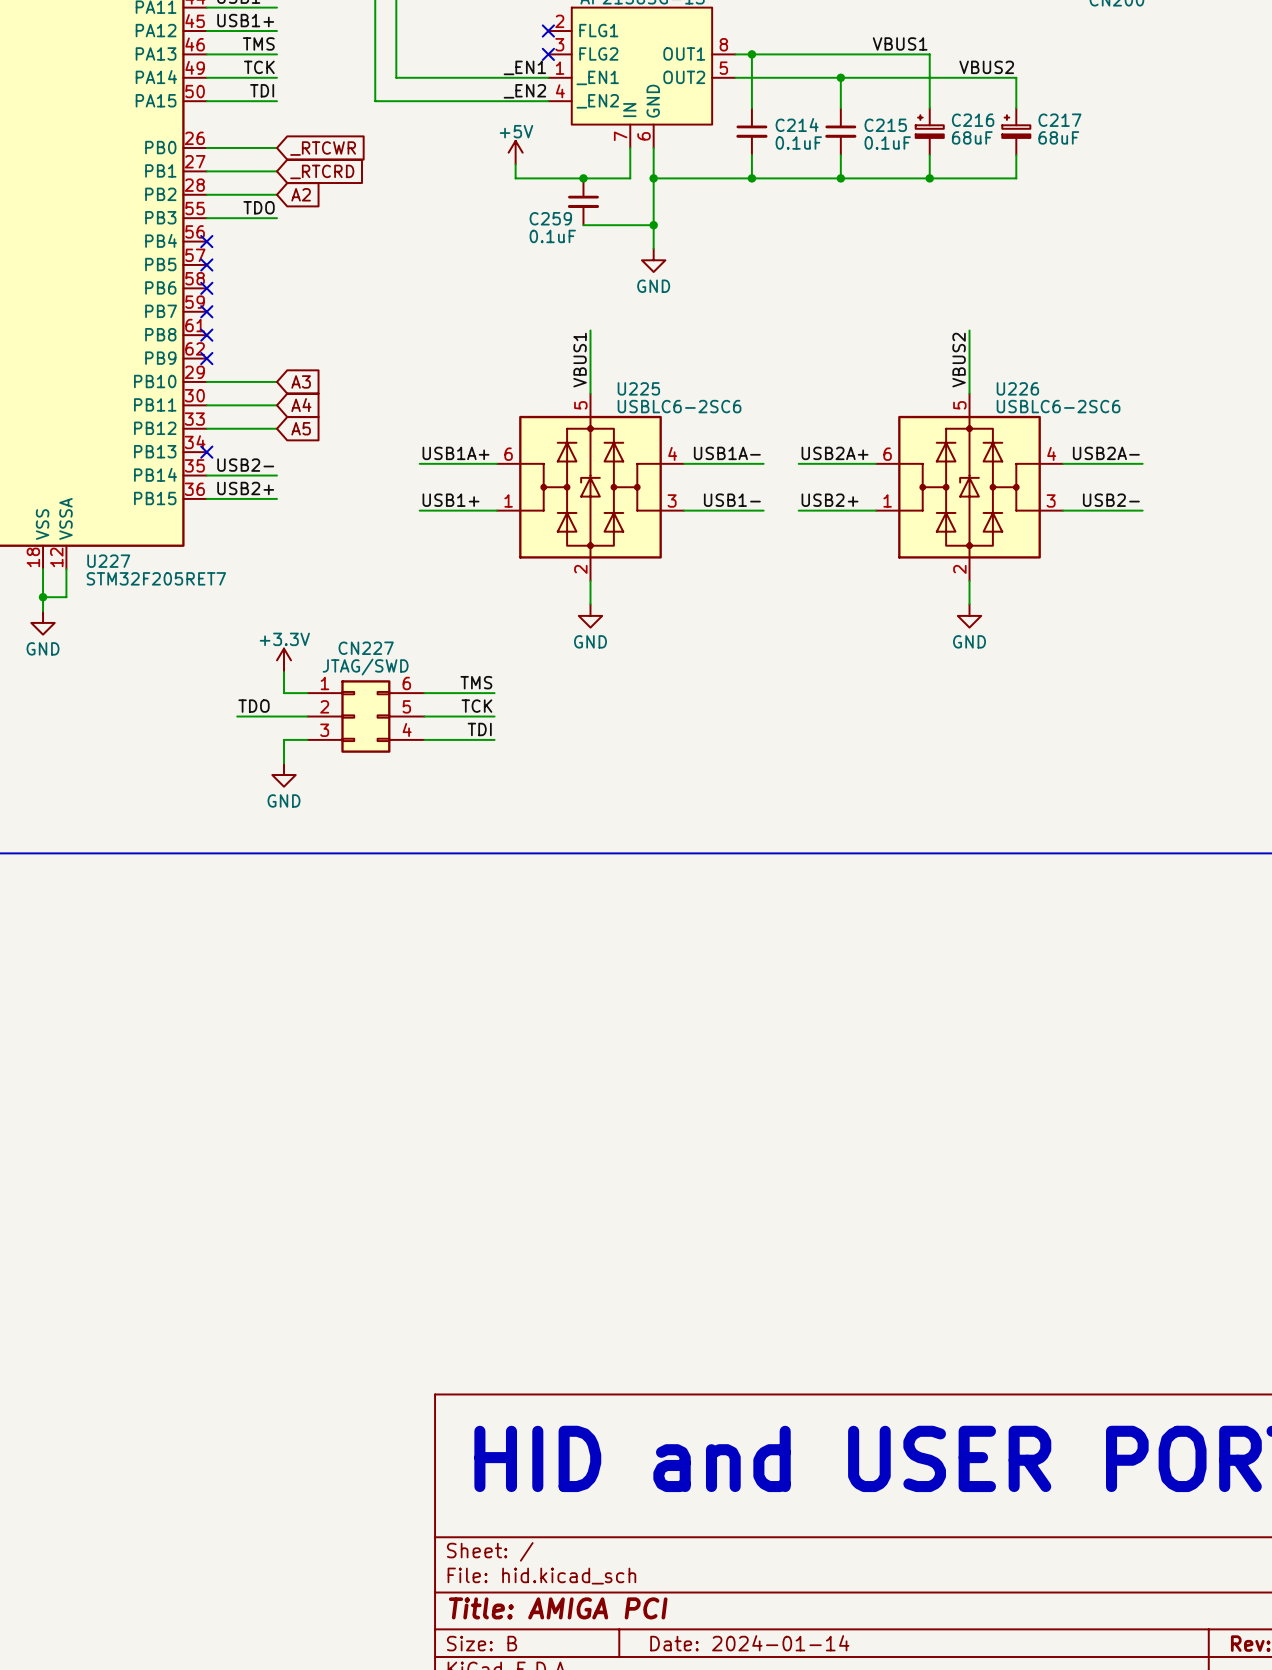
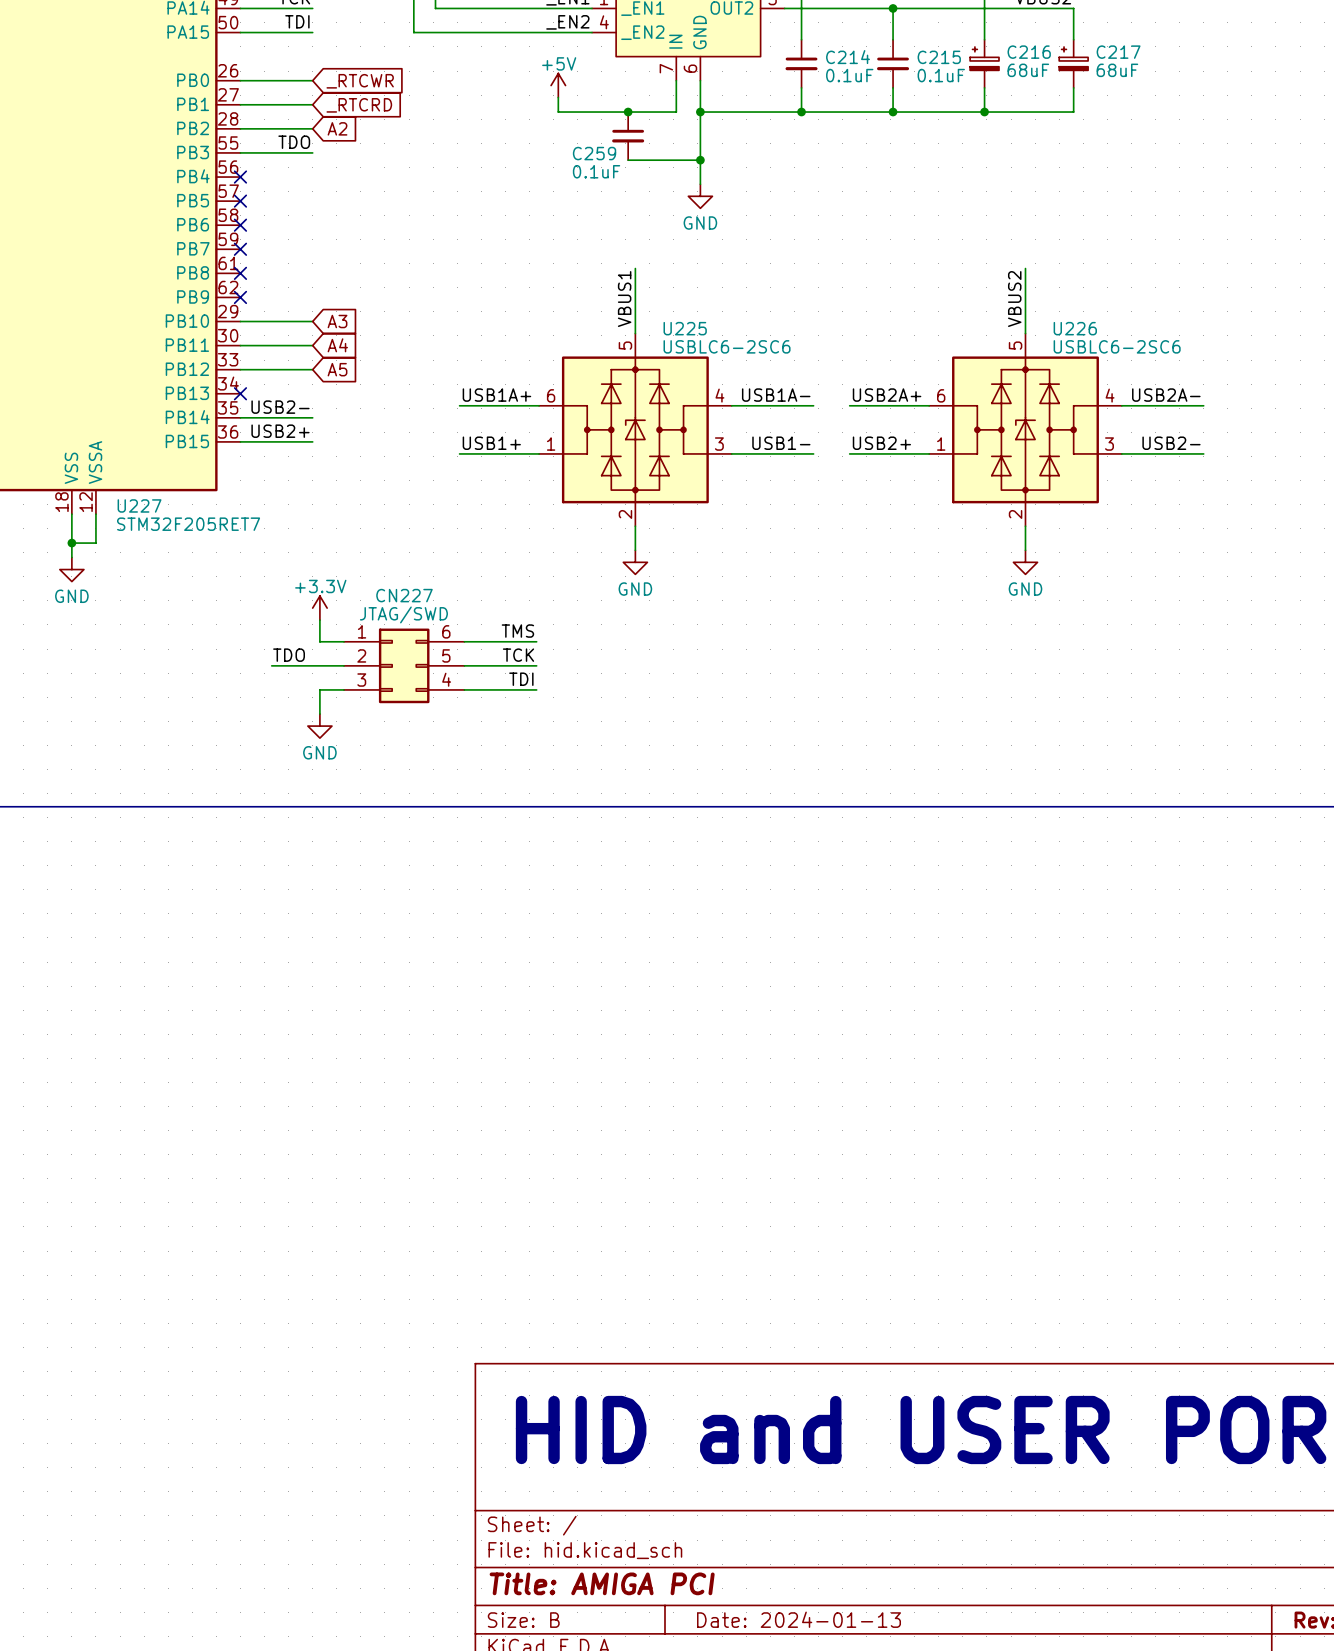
title block: Date: 2024-01-14 (749, 1643) -> Date: 2024-01-13 (799, 1619)

